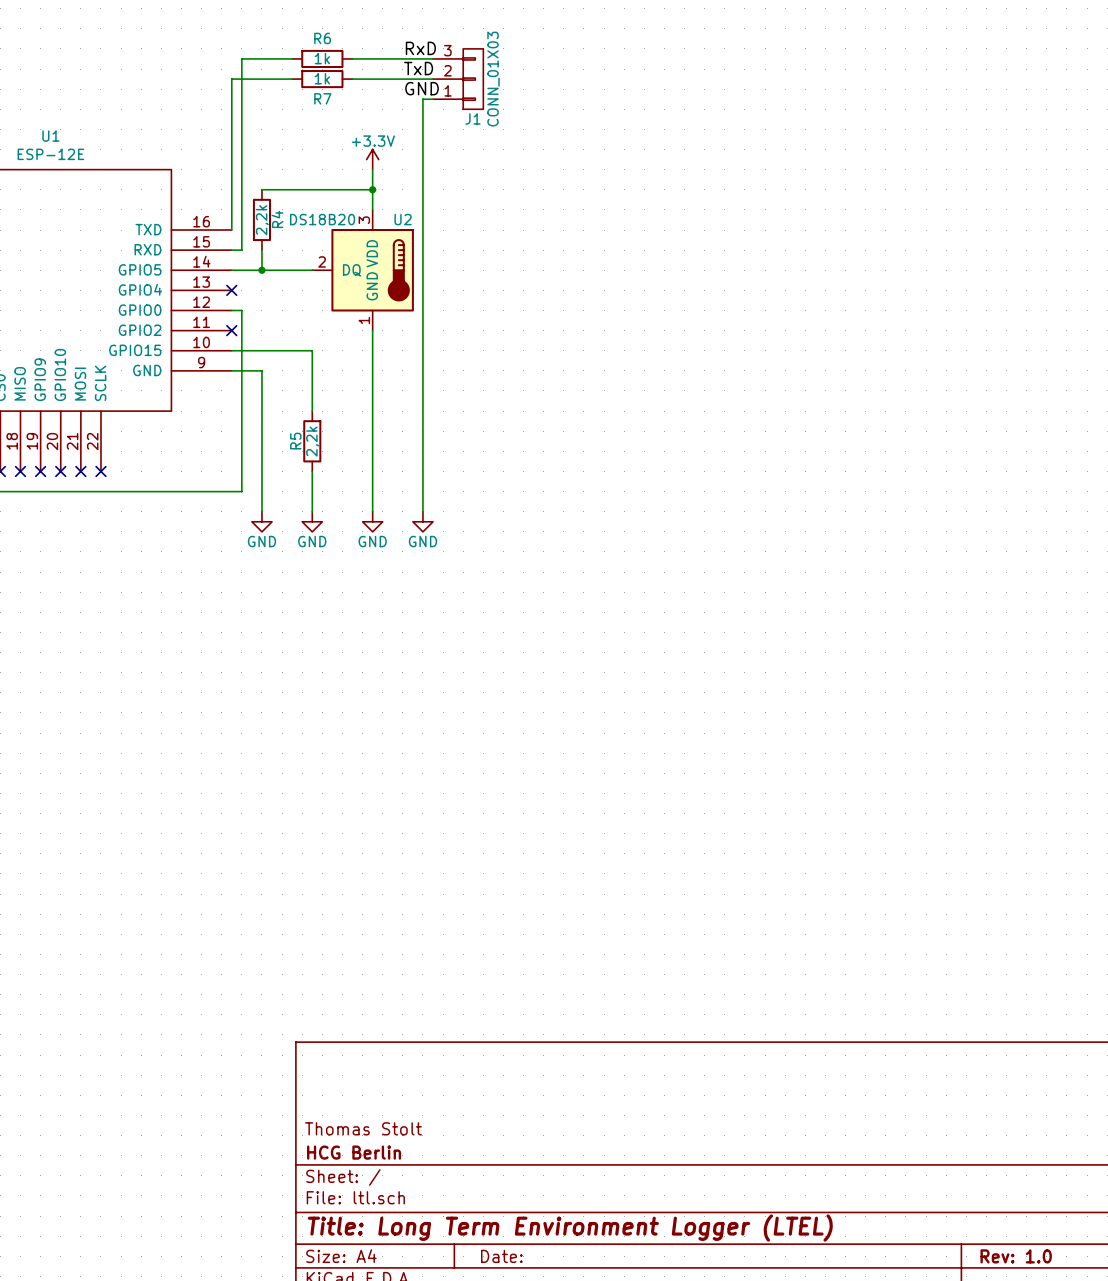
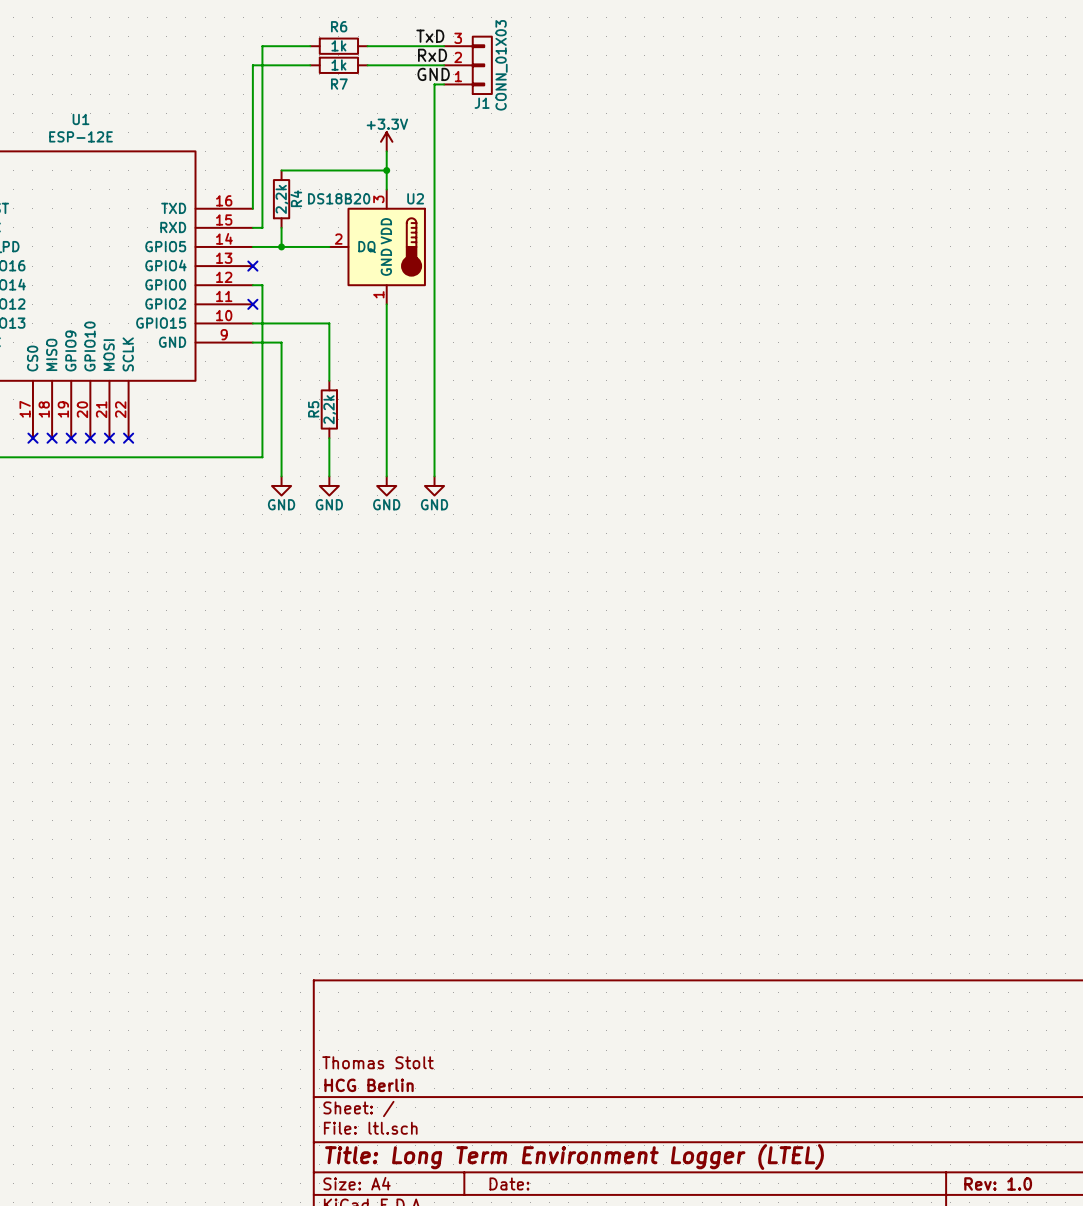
label: RxD (420, 48) -> TxD (430, 36)
label: TxD (418, 68) -> RxD (432, 55)

